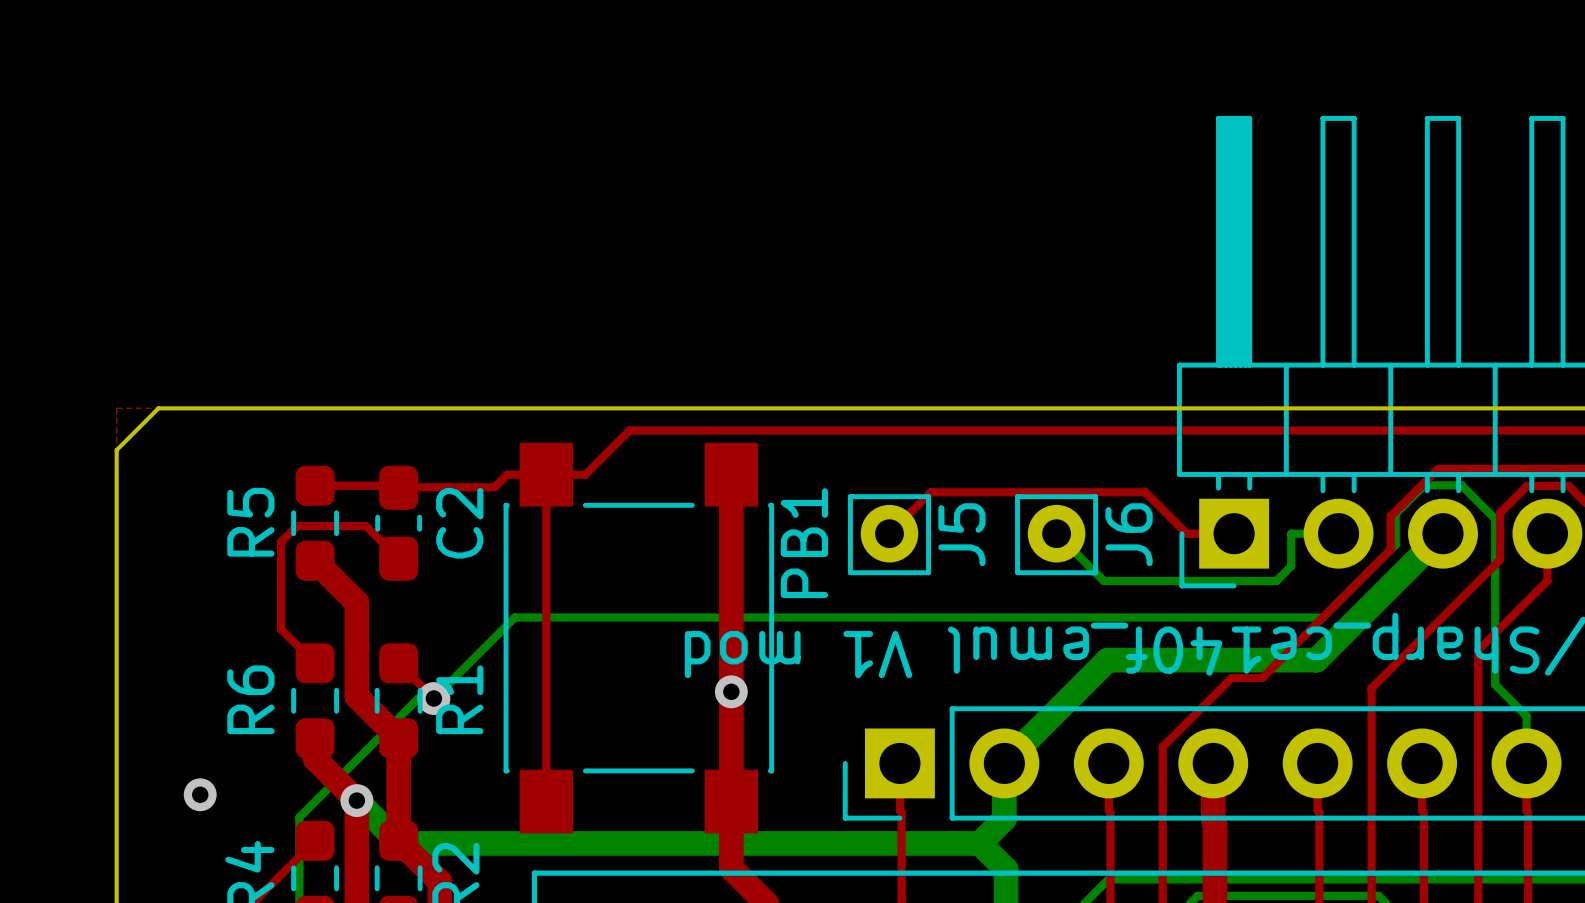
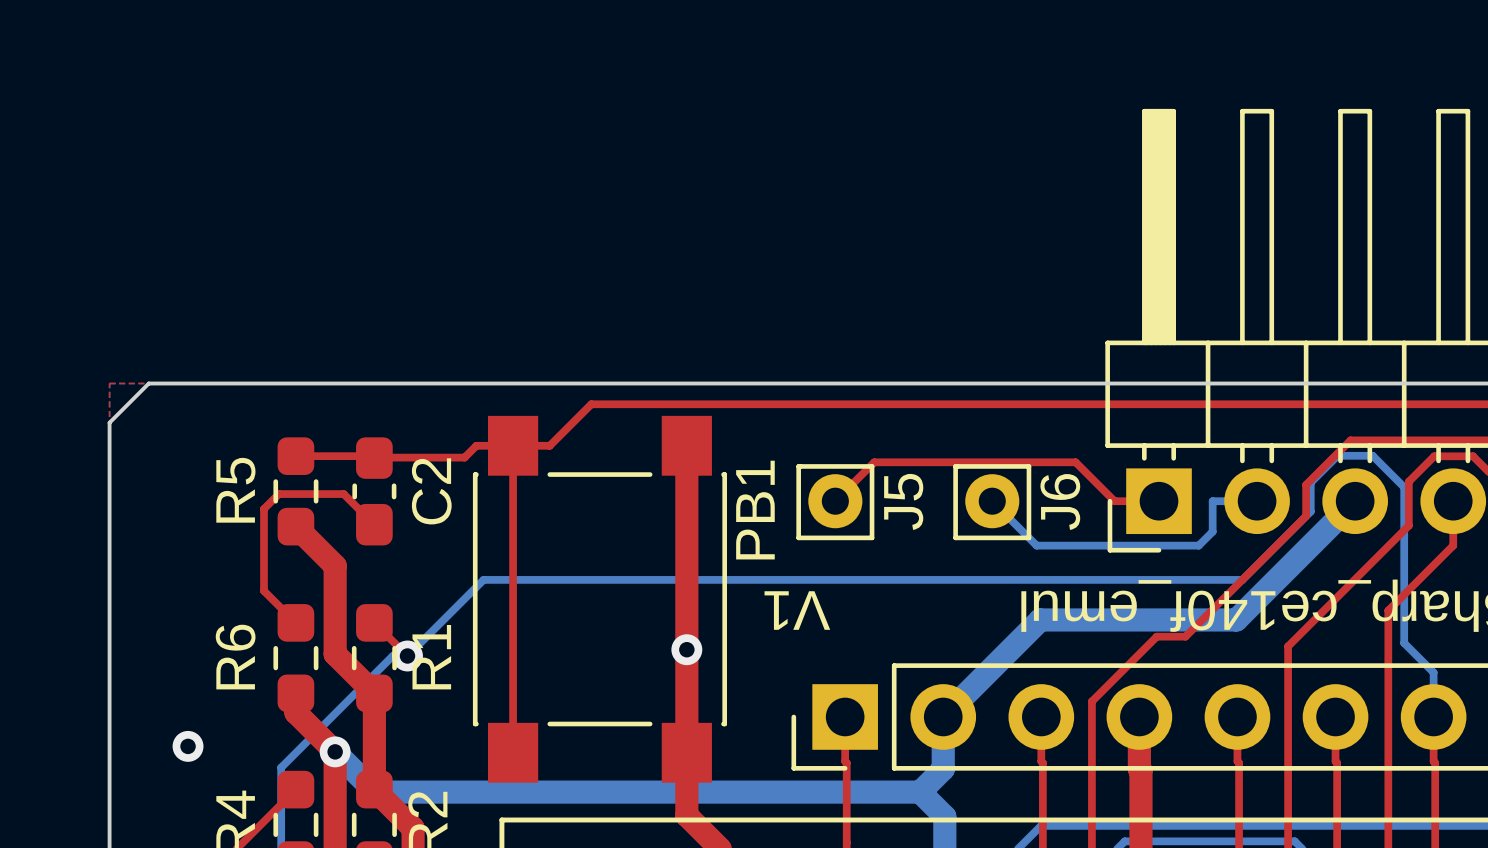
text: none -> V1 (797, 610)
text: V1 mod (798, 654) -> none

